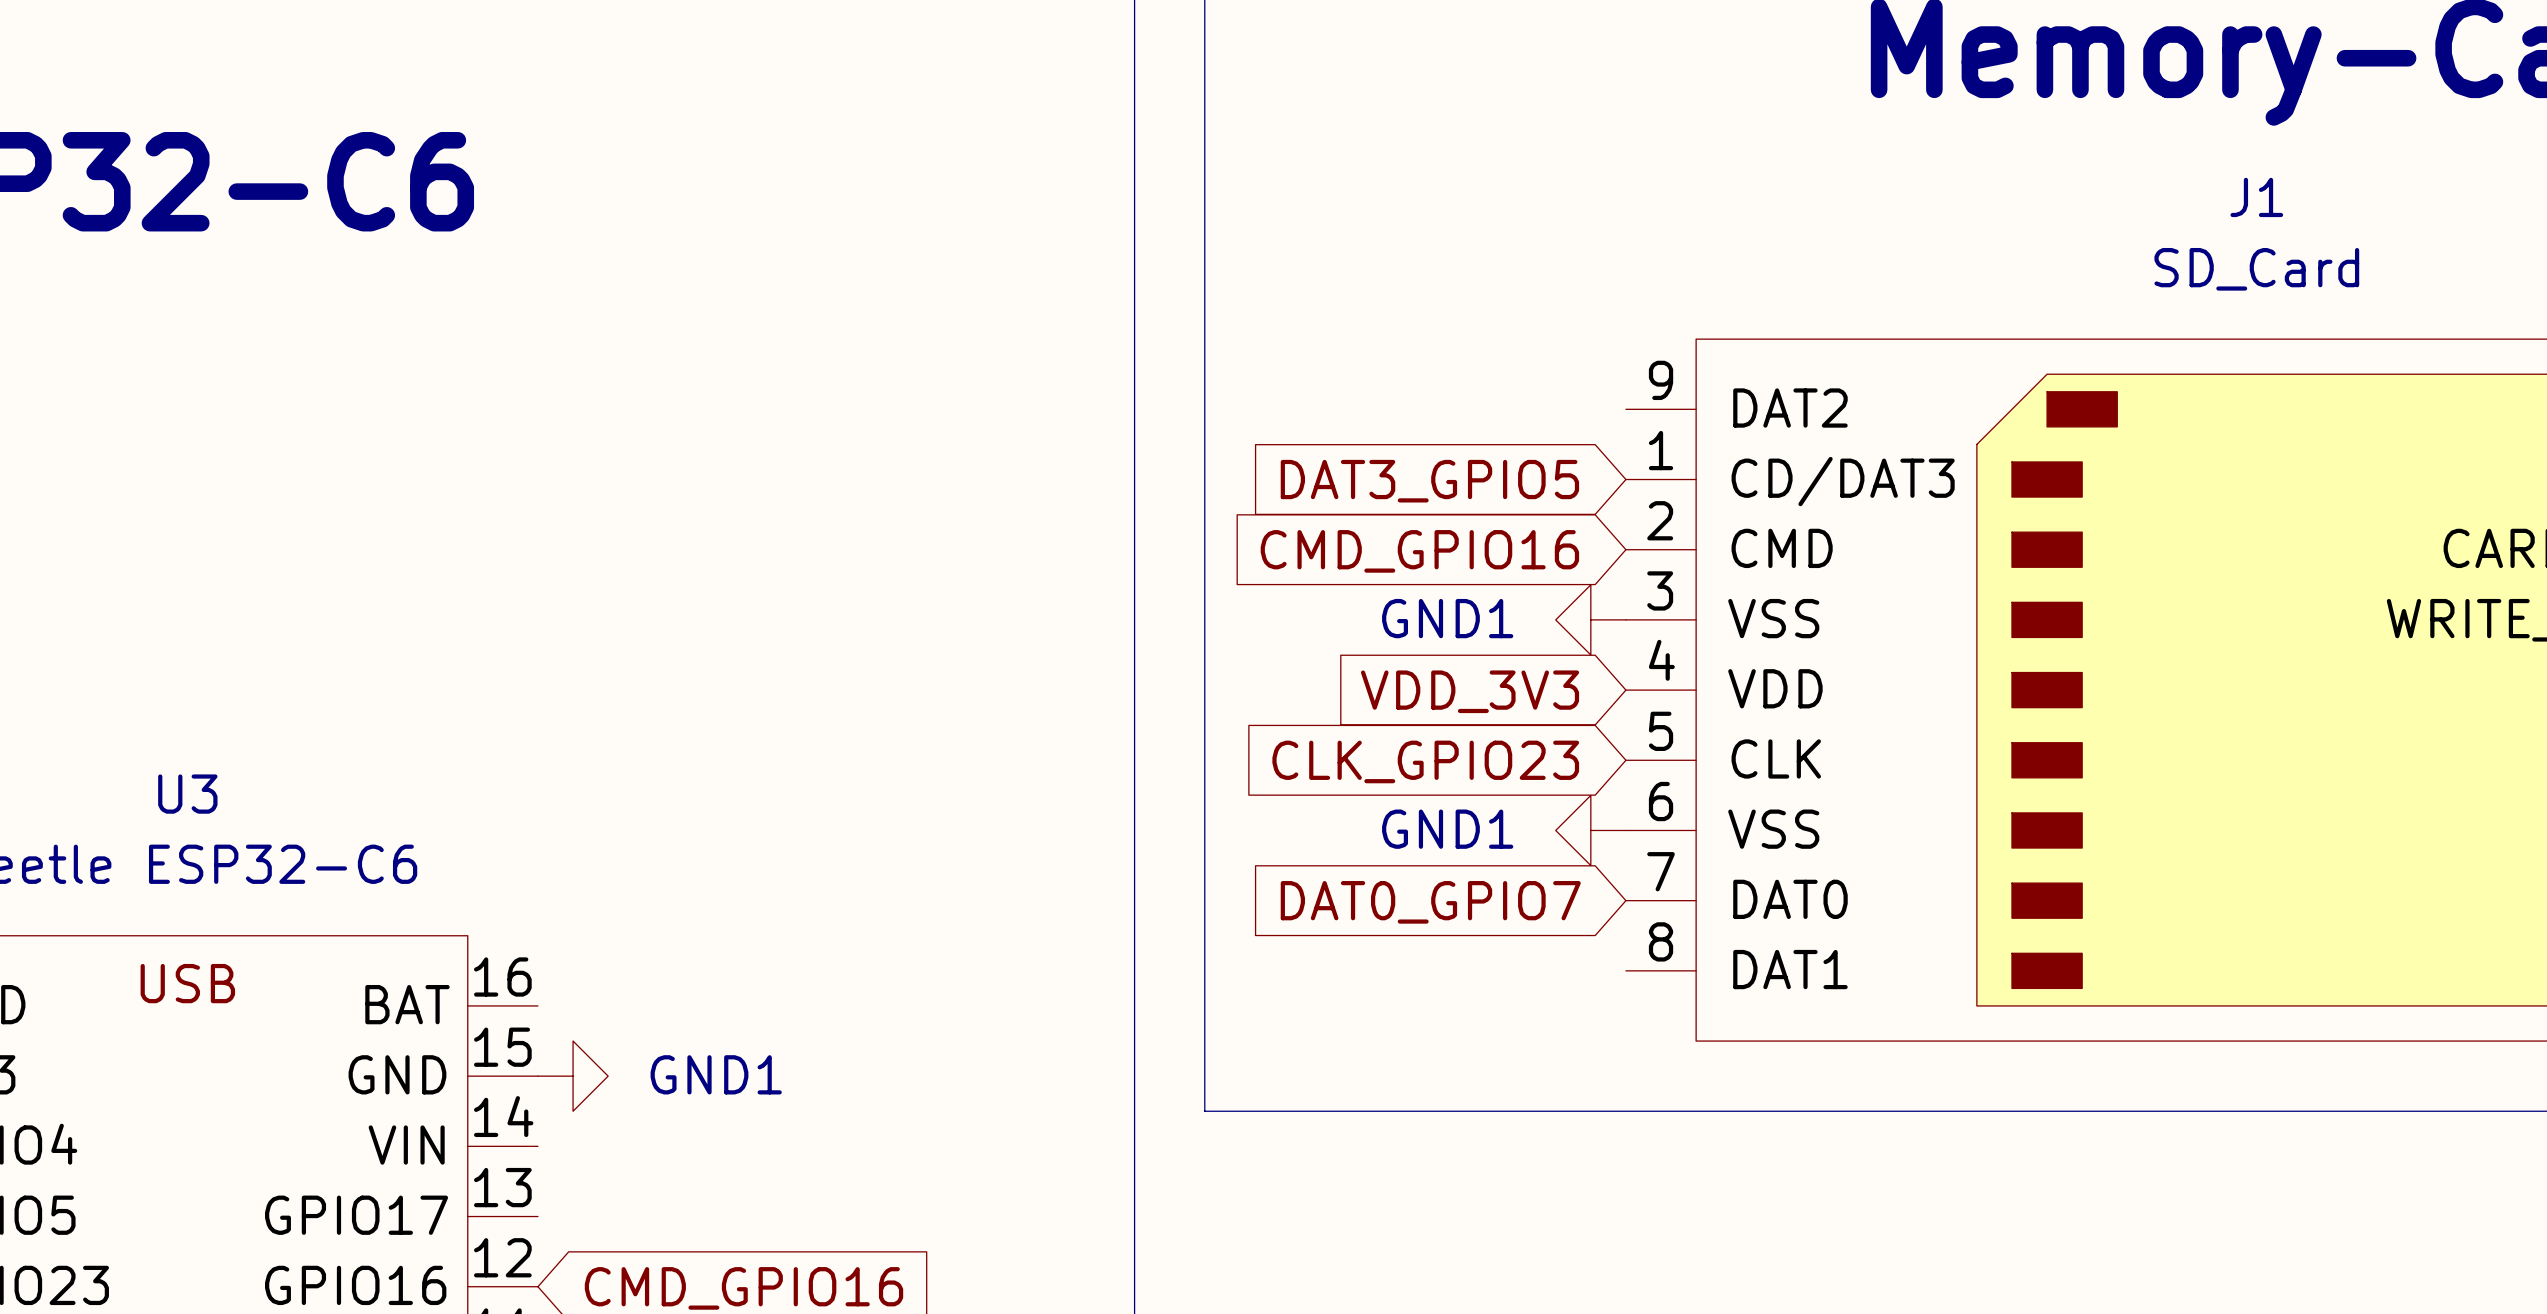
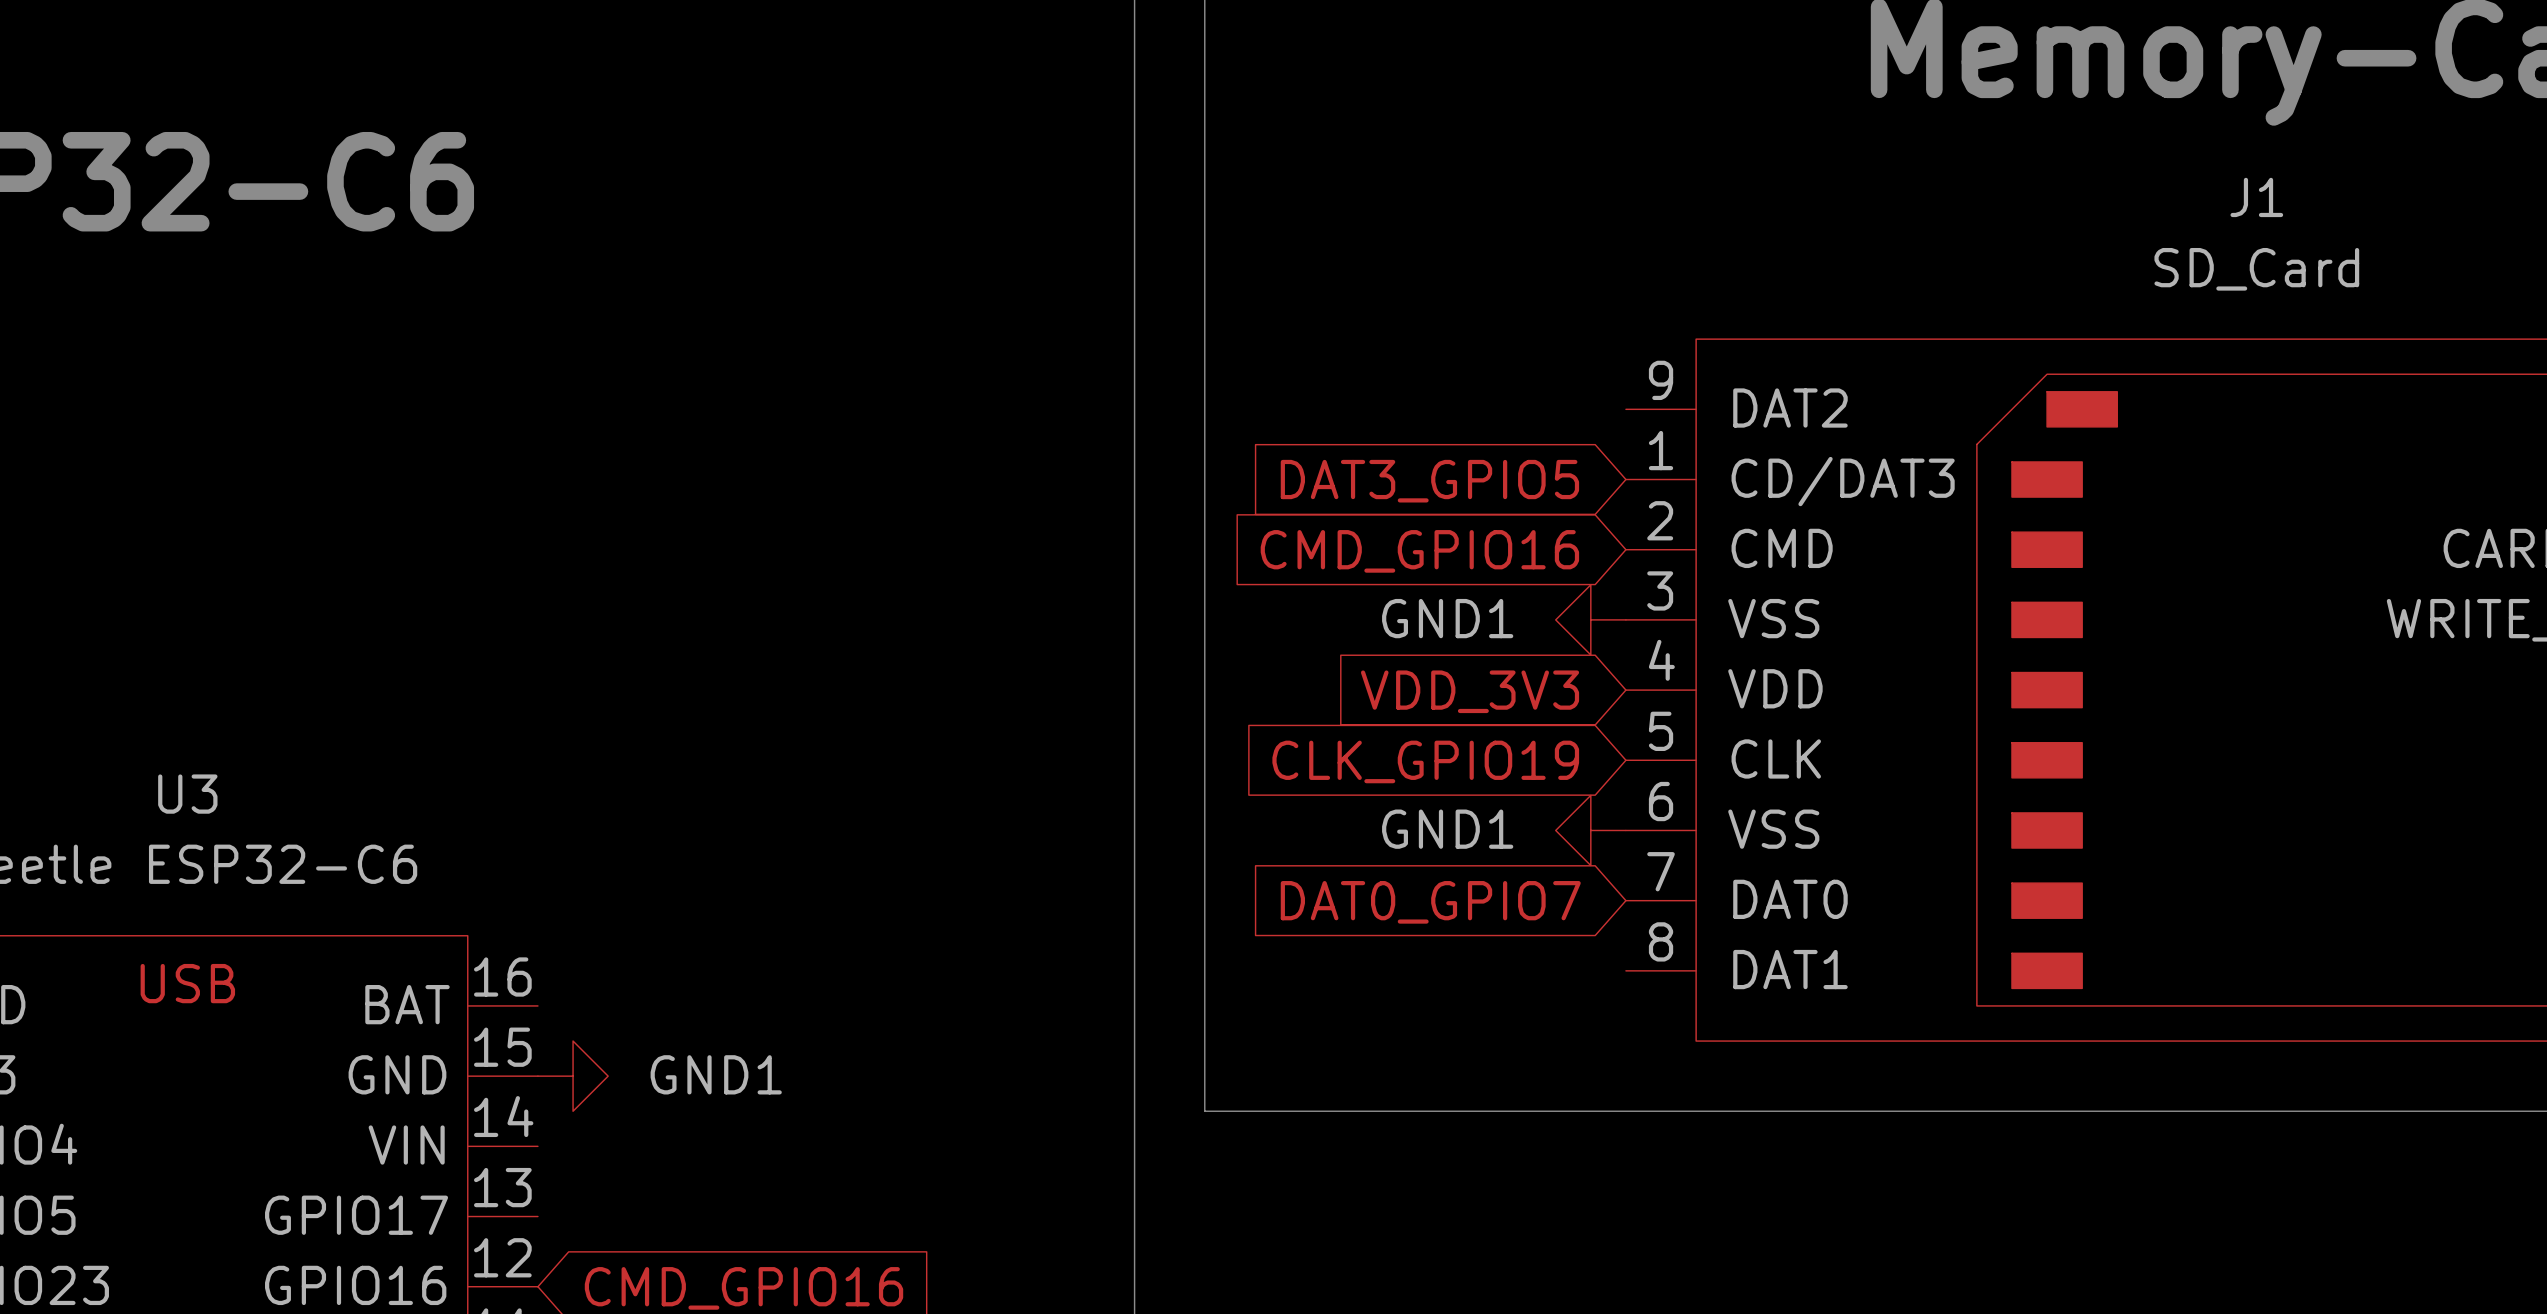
global label: CLK_GPIO23 (1425, 761) -> CLK_GPIO19 (1425, 761)

